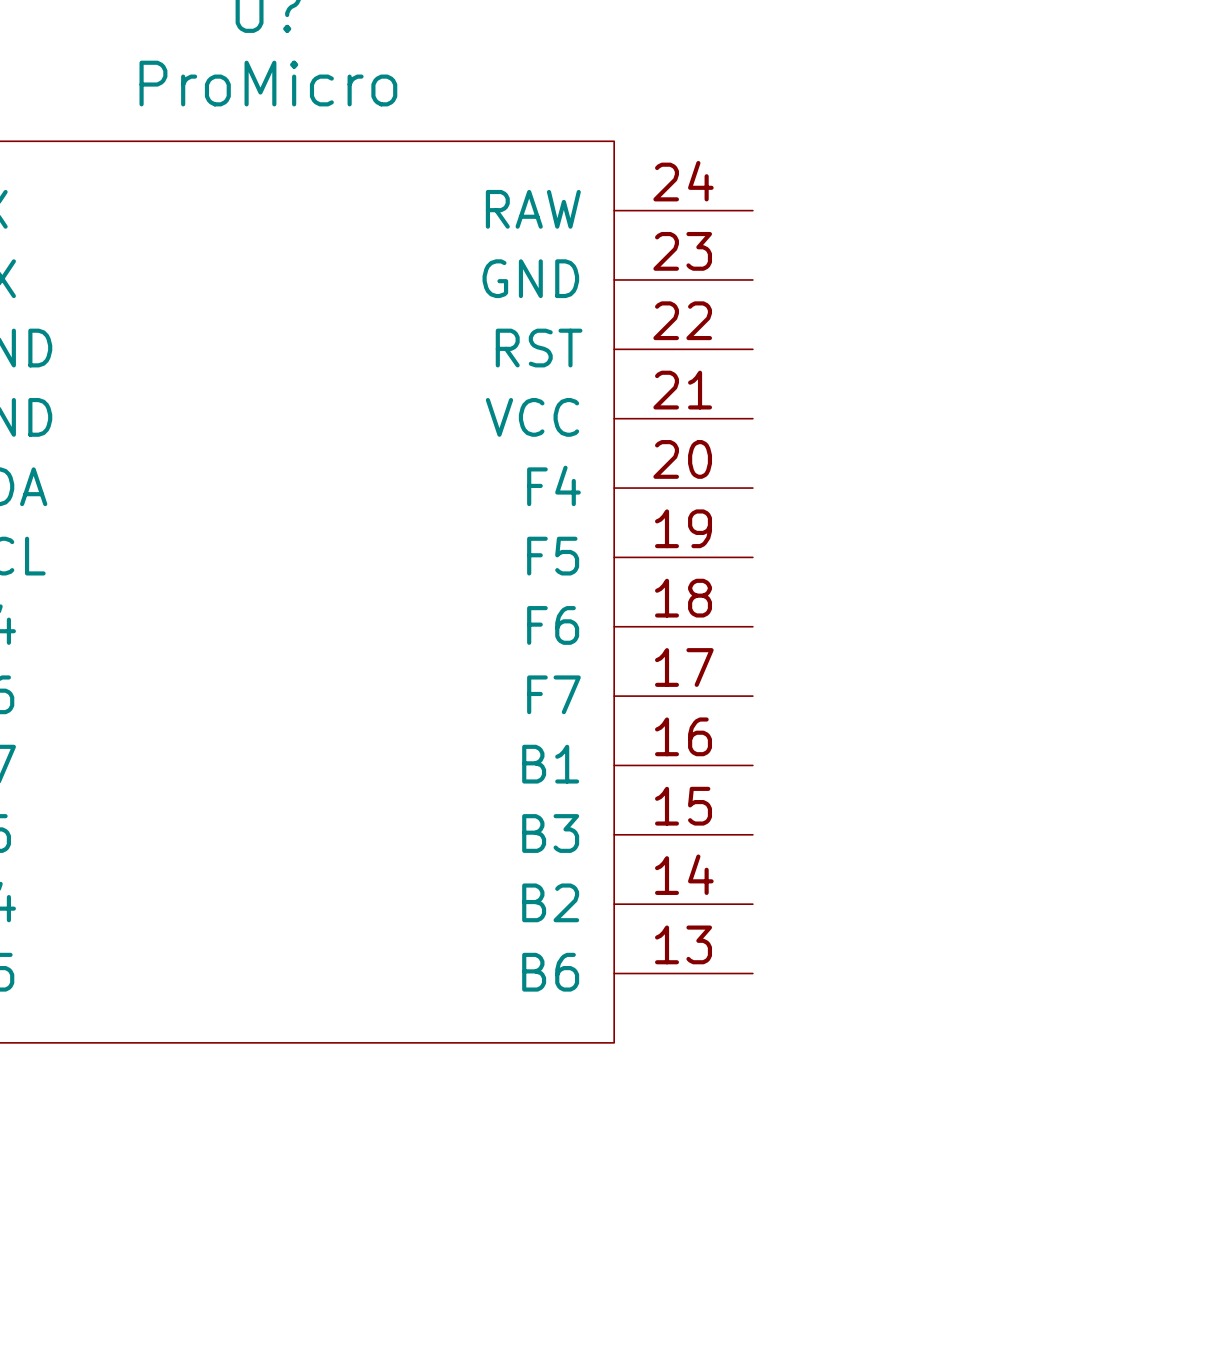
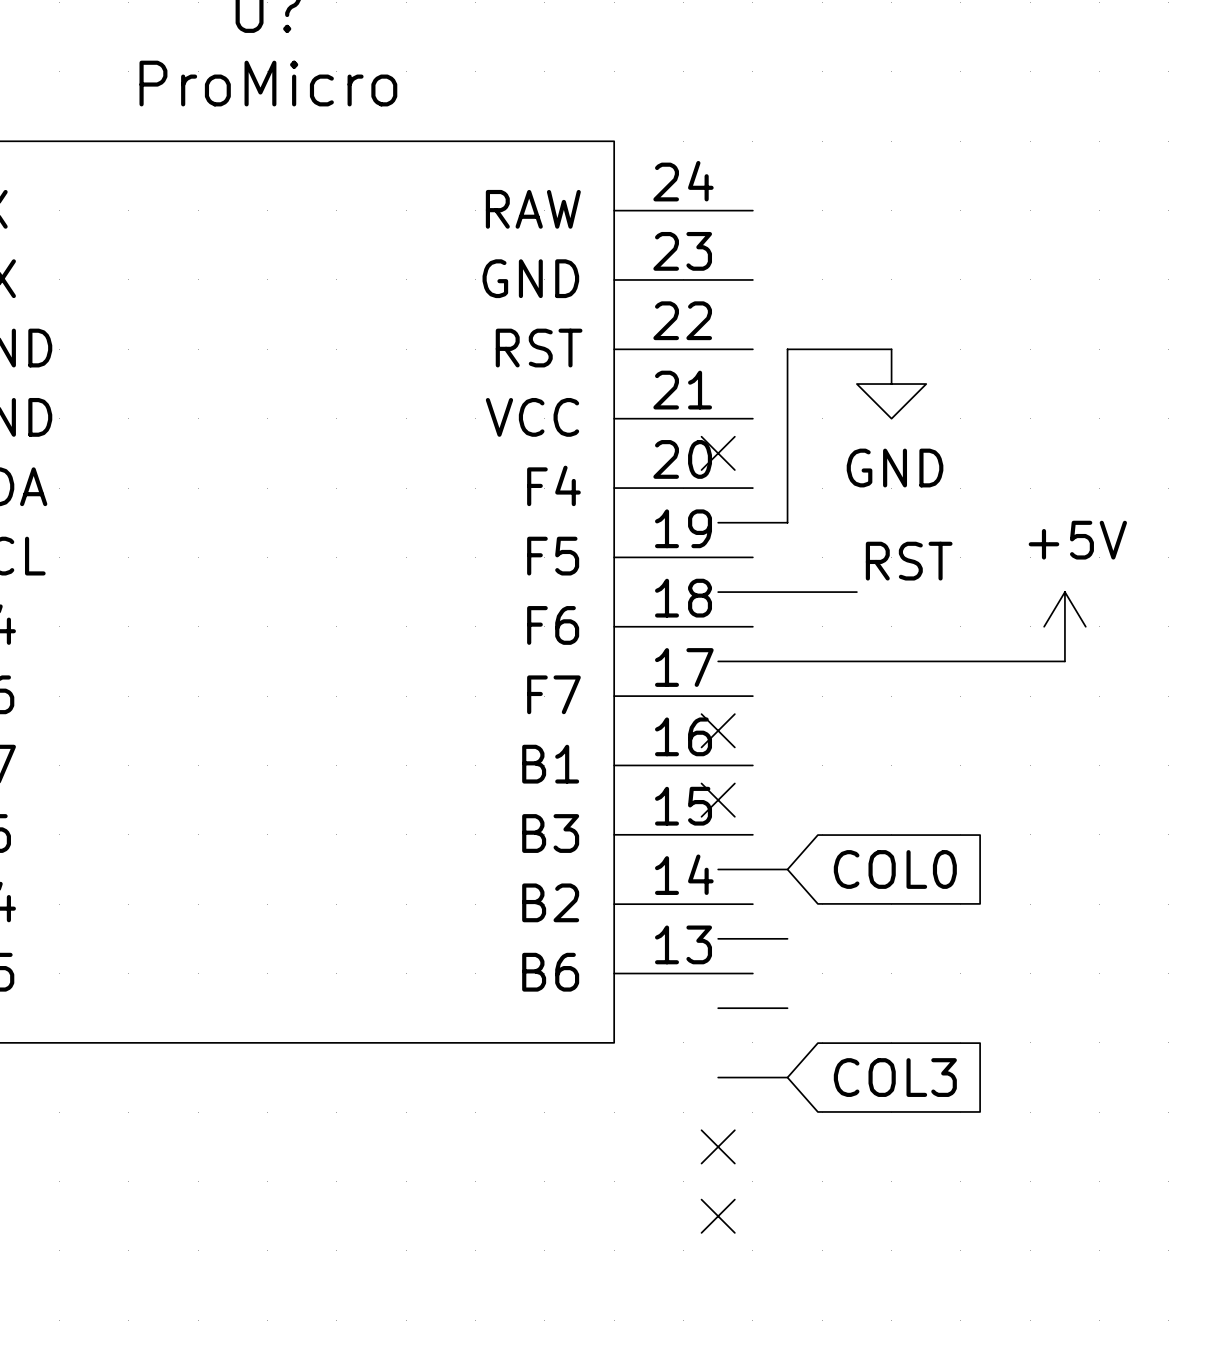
wire: none -> (891, 349) (787, 349) (787, 522) (718, 522)
power symbol: none -> GND (891, 384)
no-connect mark: none -> (718, 453)
label: none -> RST (909, 561)
wire: none -> (718, 592) (856, 592)
power symbol: none -> +5V (1064, 626)
wire: none -> (718, 661) (1064, 661)
no-connect mark: none -> (718, 730)
no-connect mark: none -> (718, 800)
wire: none -> (718, 869) (787, 869)
global label: none -> COL0 (895, 869)
wire: none -> (718, 938) (787, 938)
wire: none -> (718, 1008) (787, 1008)
wire: none -> (718, 1077) (787, 1077)
global label: none -> COL3 (895, 1077)
no-connect mark: none -> (718, 1146)
no-connect mark: none -> (718, 1216)

